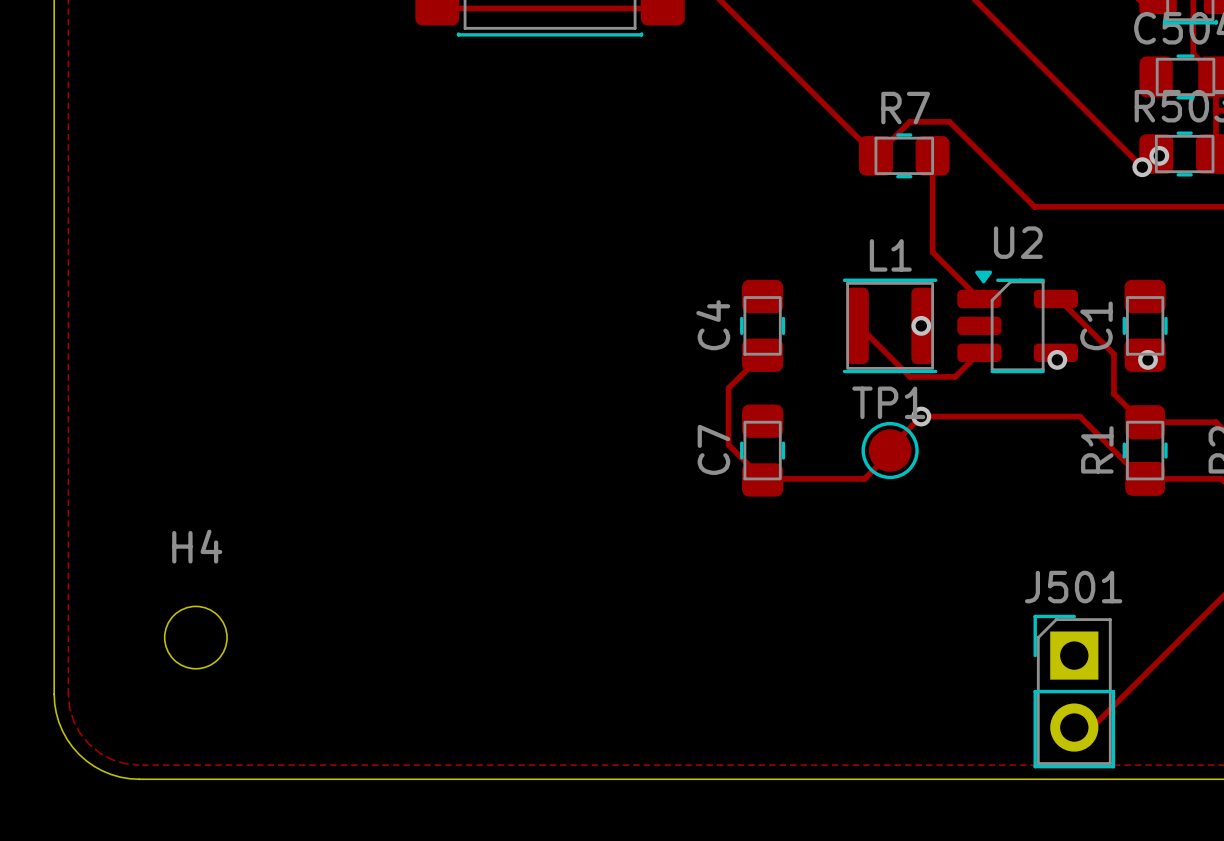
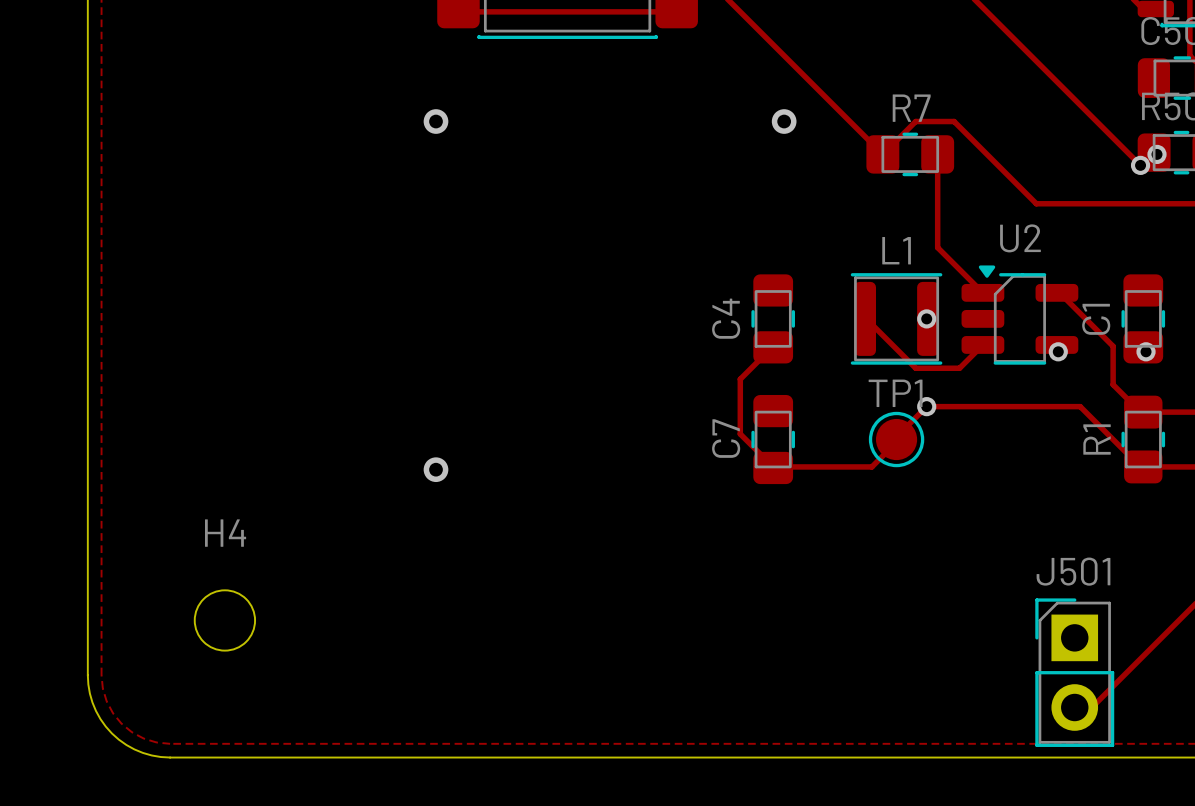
via: none -> (436, 121)
via: none -> (784, 121)
via: none -> (436, 469)

